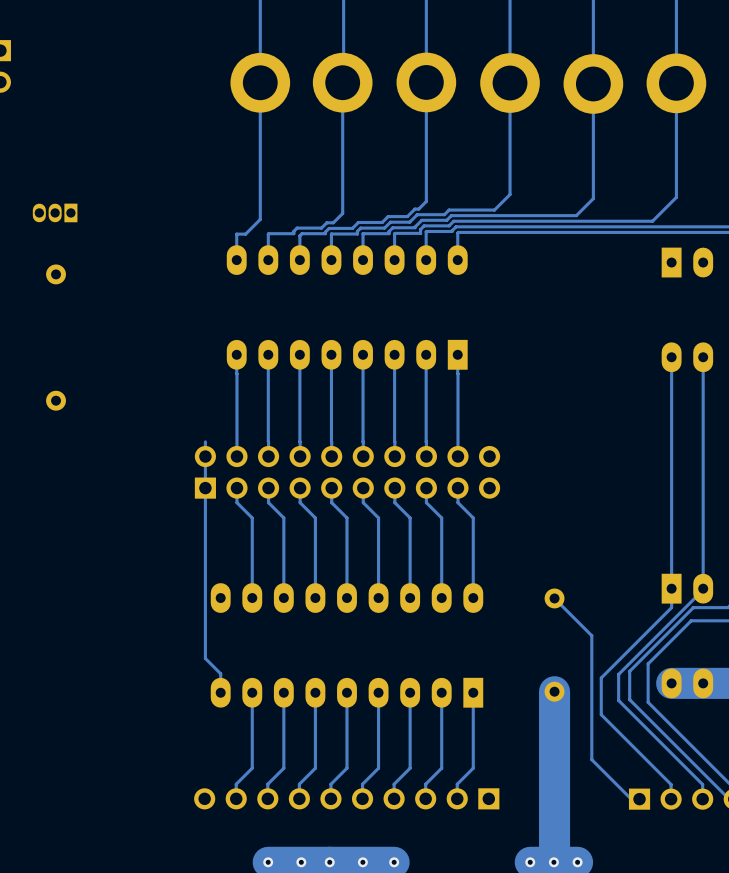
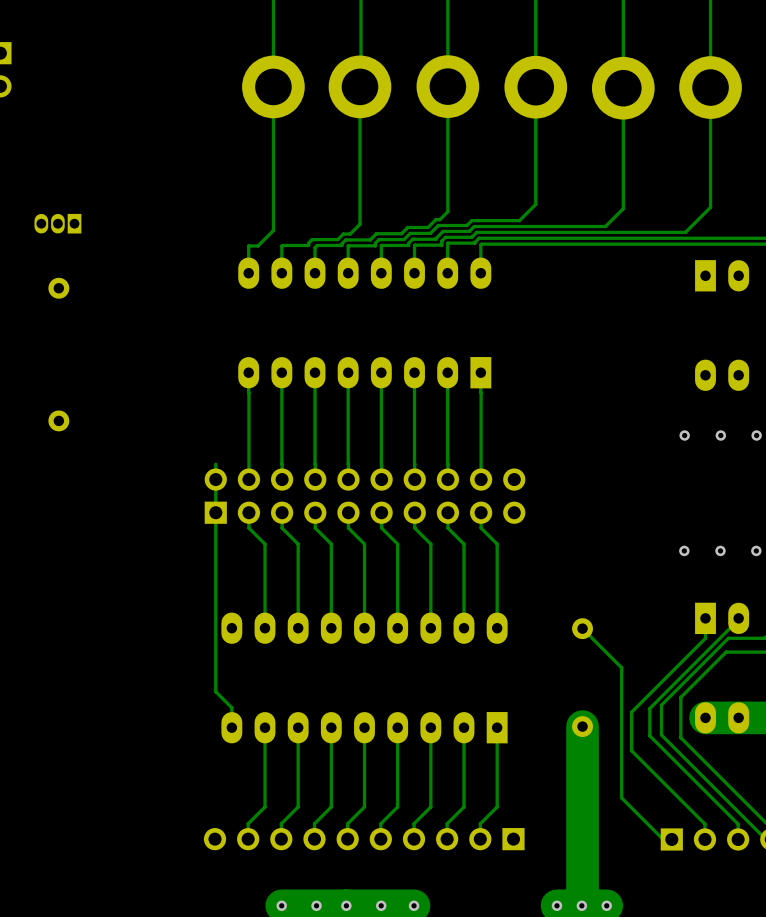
track: (671, 357) (671, 588) -> none
track: (703, 357) (703, 588) -> none
via: none -> (684, 435)
via: none -> (720, 435)
via: none -> (756, 435)
via: none -> (684, 550)
via: none -> (720, 550)
via: none -> (756, 550)

